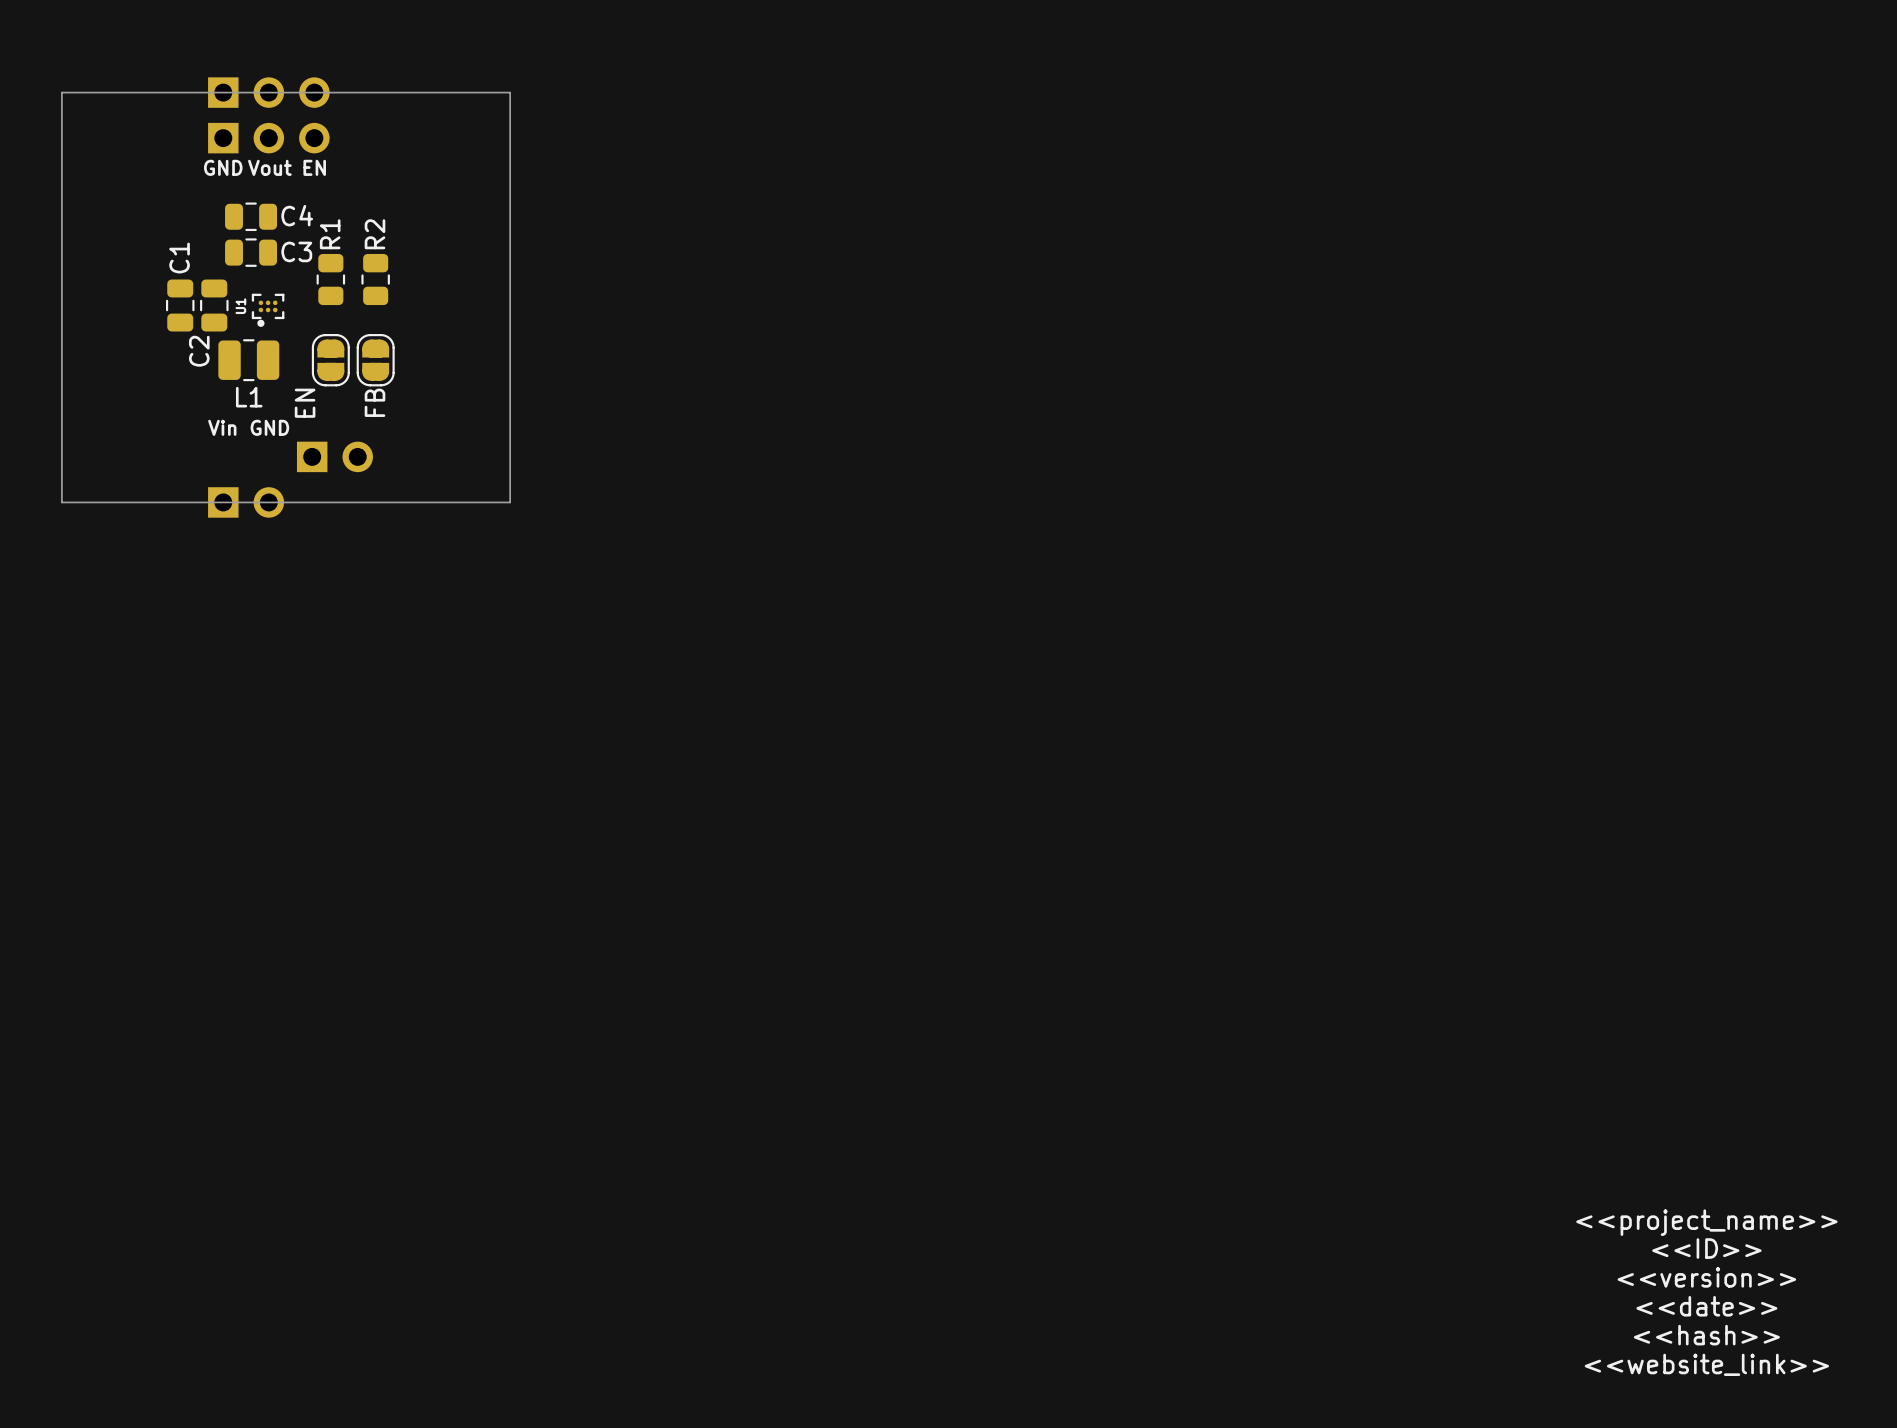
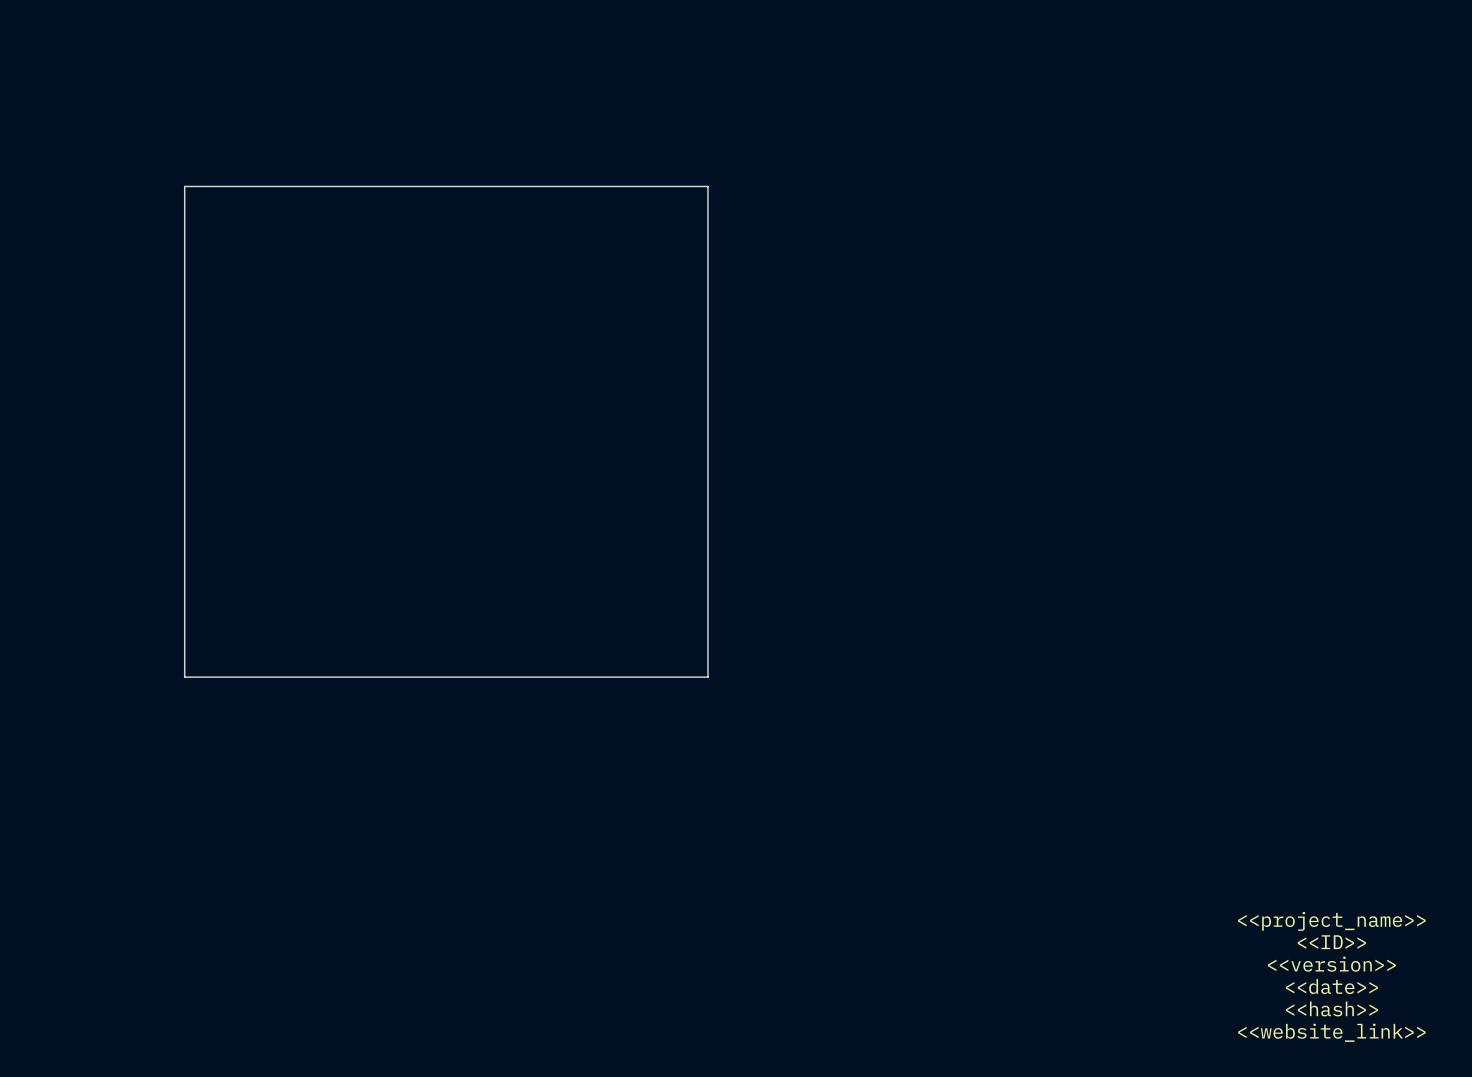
board edge: (61, 92) (510, 92) (510, 502) (61, 502) (61, 92) -> none
part: (268, 92) -> none
part: (268, 138) -> none
text: GND (223, 167) -> none
text: Vout (269, 167) -> none
text: EN (314, 167) -> none
C4: (251, 216) -> none
C3: (251, 252) -> none
board edge: none -> (184, 186) (707, 186) (707, 677) (184, 677) (184, 186)
R1: (330, 279) -> none
R2: (375, 279) -> none
C1: (180, 305) -> none
C2: (214, 305) -> none
U1: (268, 310) -> none
L1: (248, 360) -> none
part: (330, 360) -> none
part: (375, 360) -> none
text: Vin (222, 427) -> none
text: GND (269, 427) -> none
part: (334, 456) -> none
part: (246, 502) -> none

